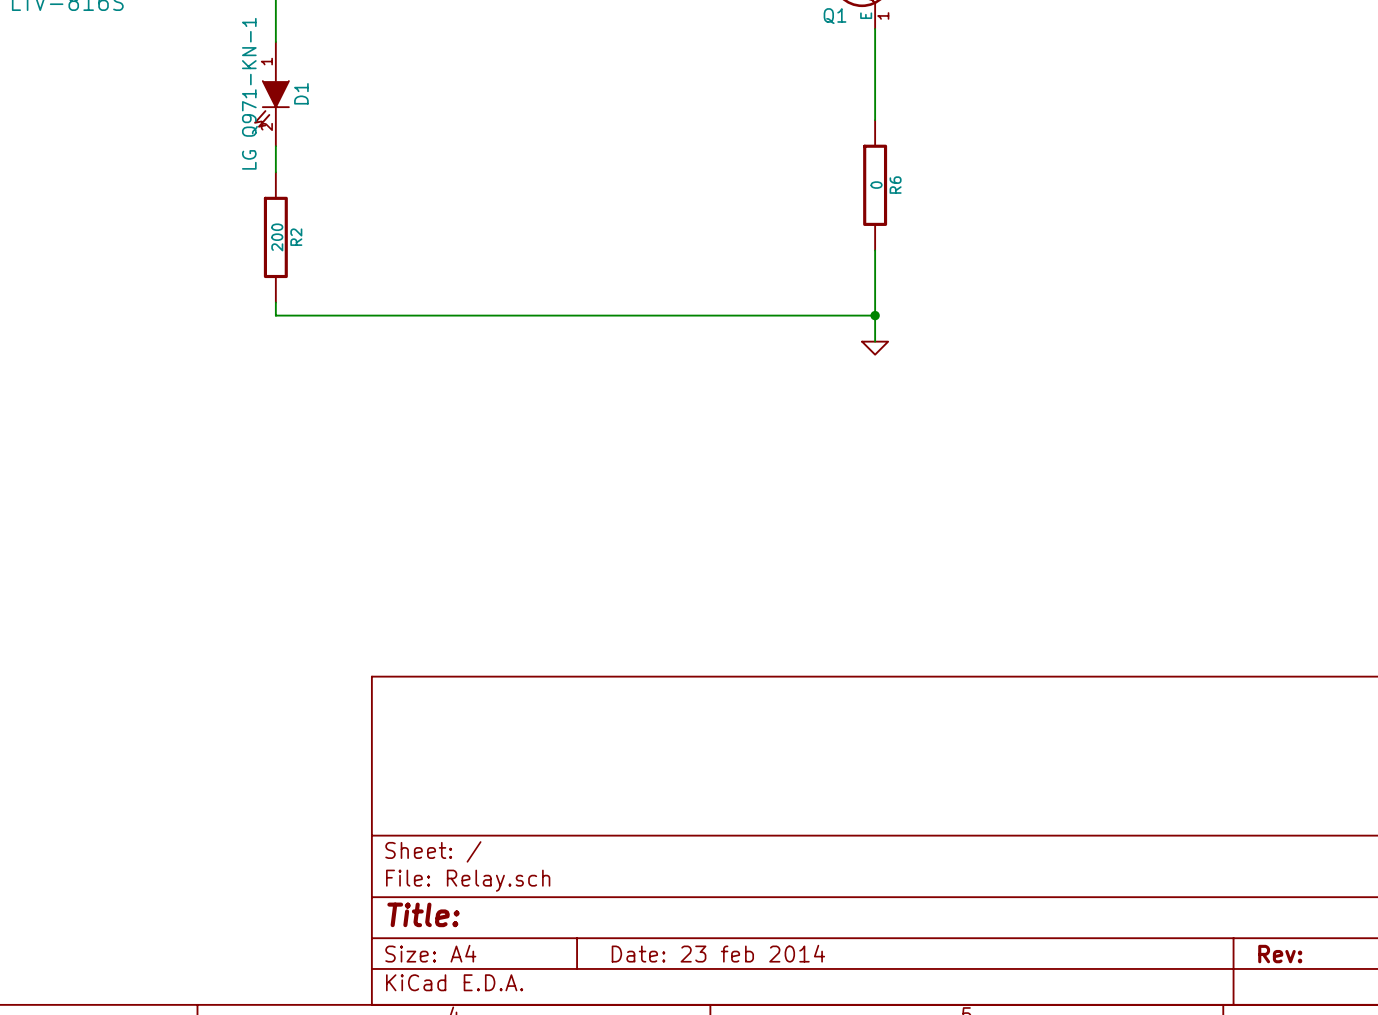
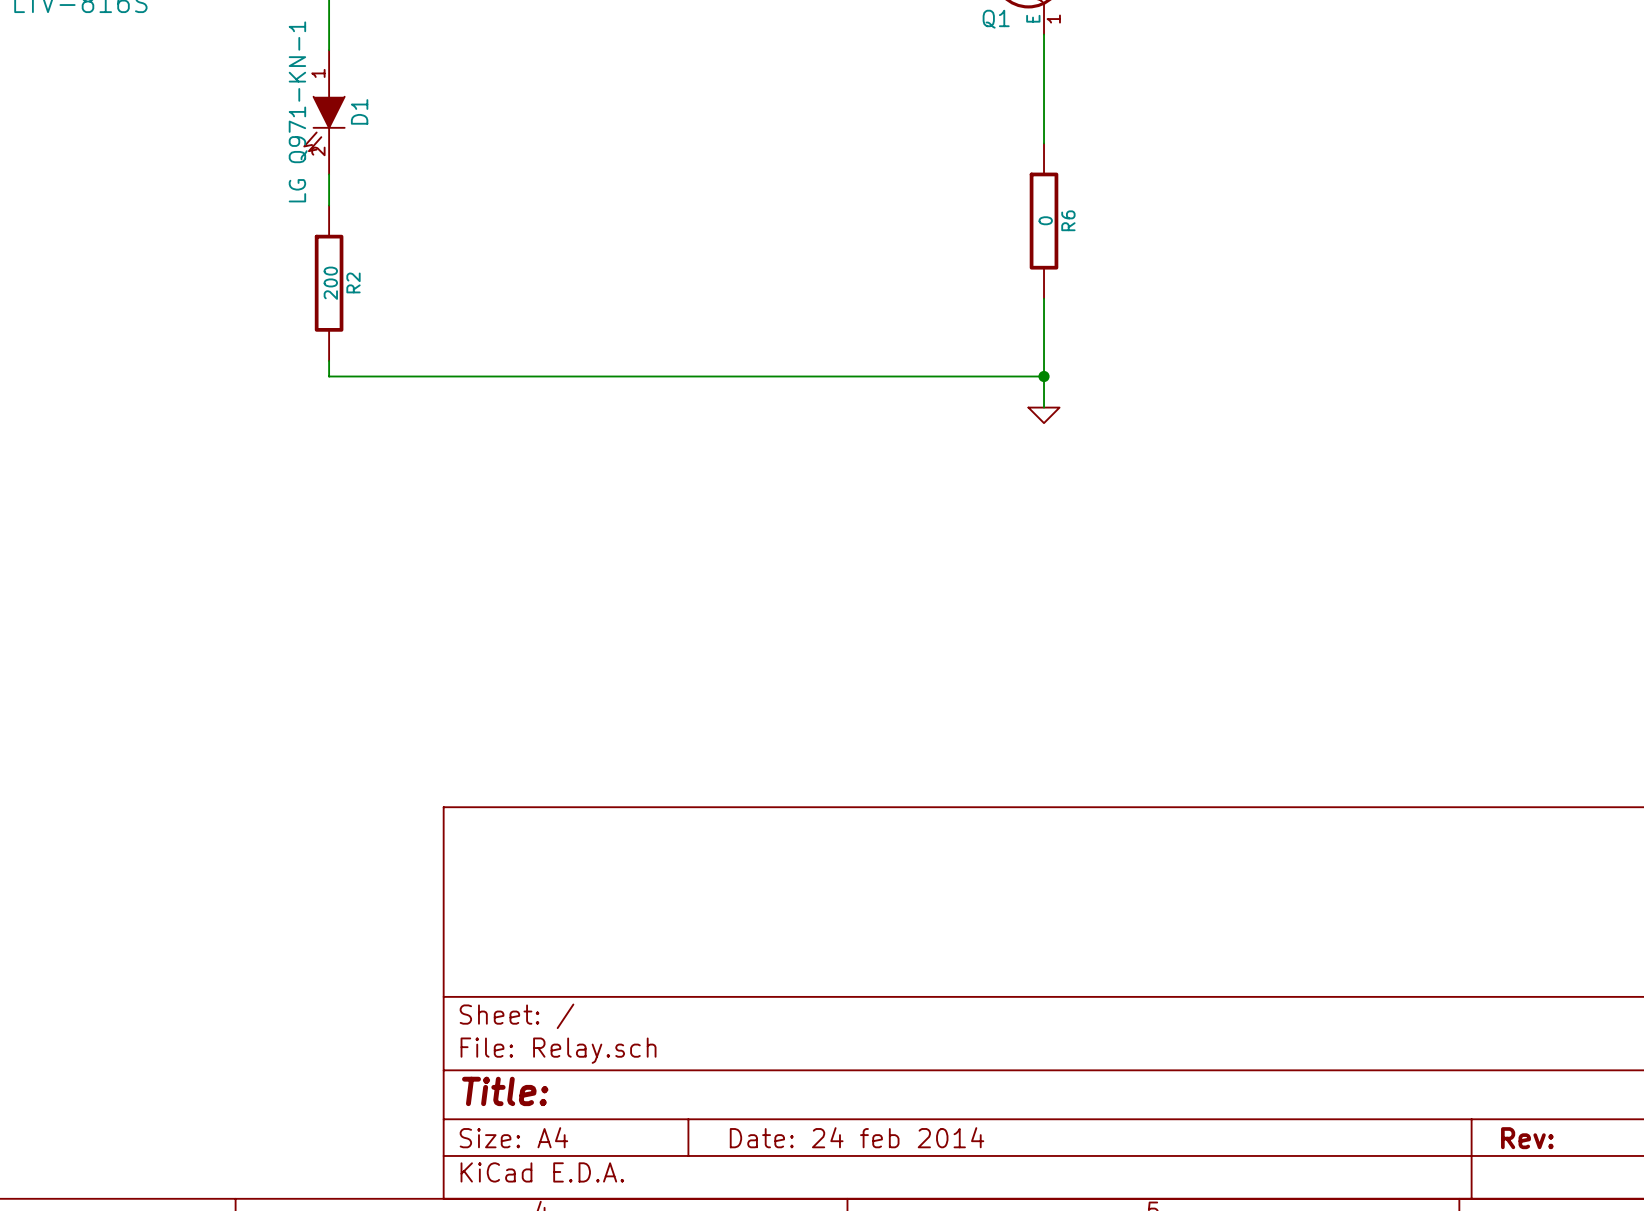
title block: Date: 23 feb 2014 (718, 953) -> Date: 24 feb 2014 (857, 1137)

